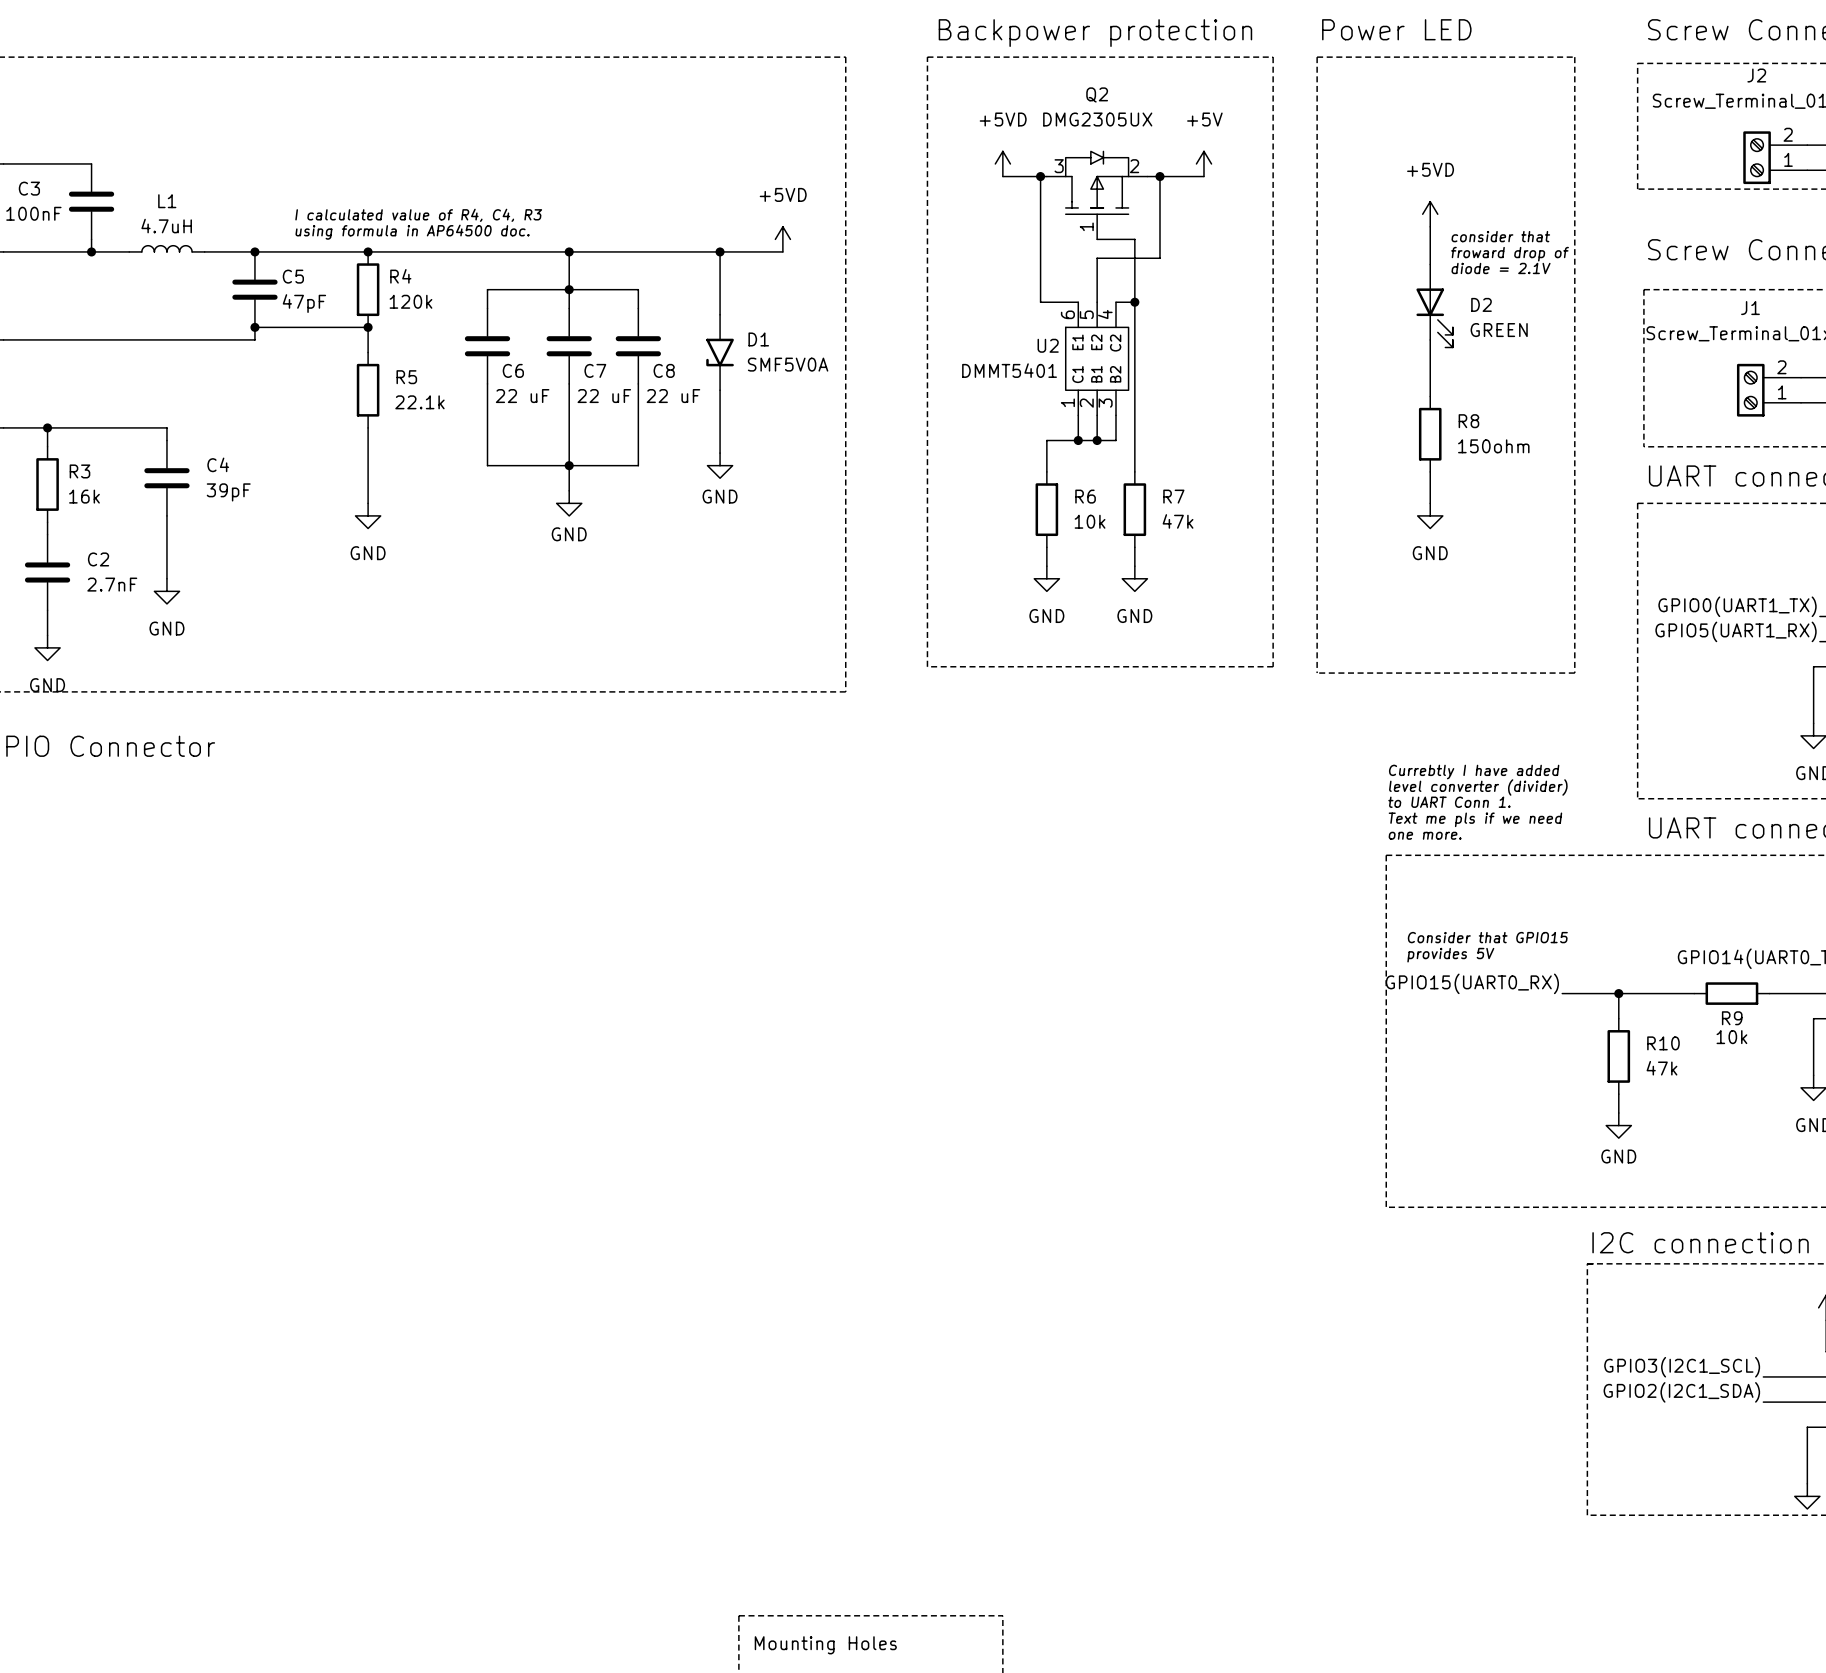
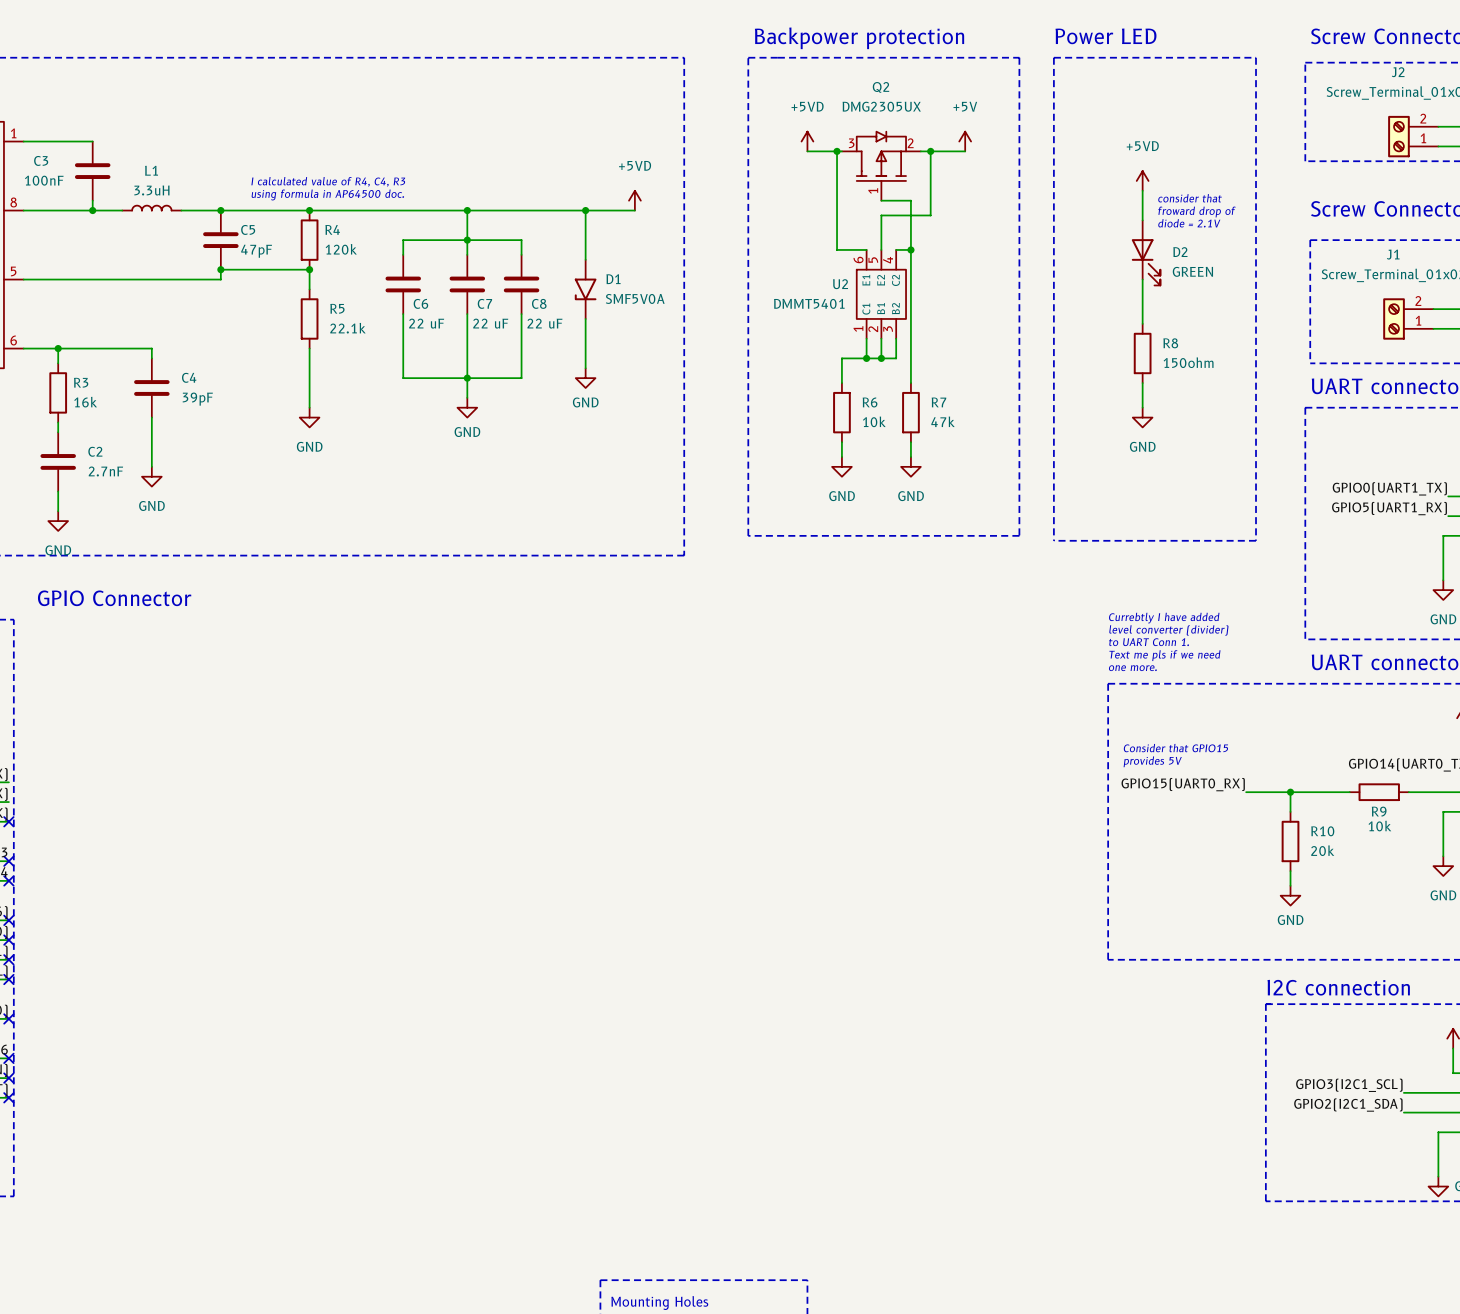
L1 value: 4.7uH (166, 226) -> 3.3uH (151, 190)
R10 value: 47k (1661, 1068) -> 20k (1322, 850)

